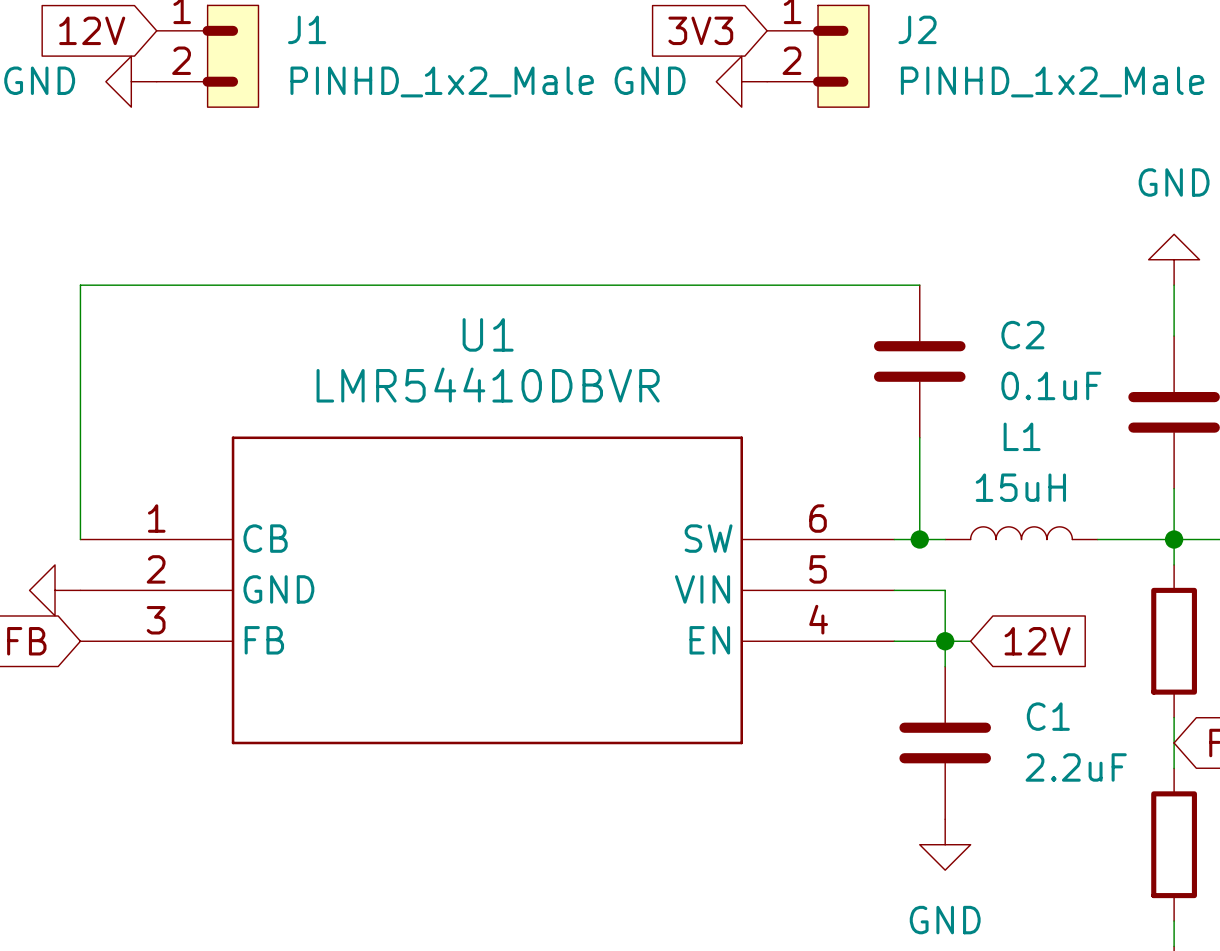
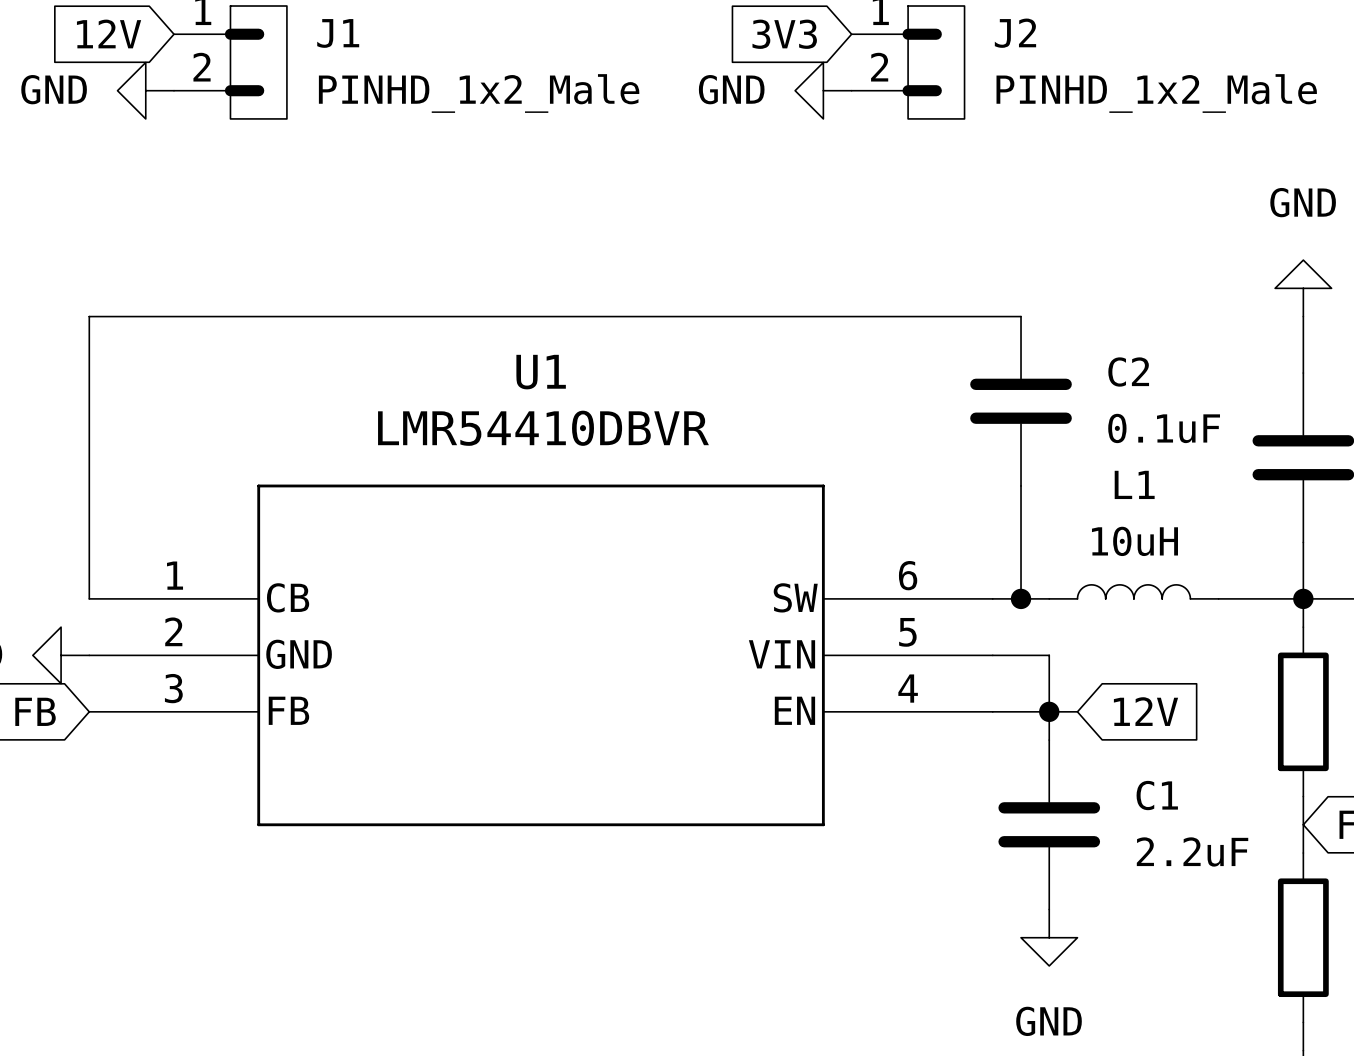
L1 value: 15uH (1020, 487) -> 10uH (1134, 541)

